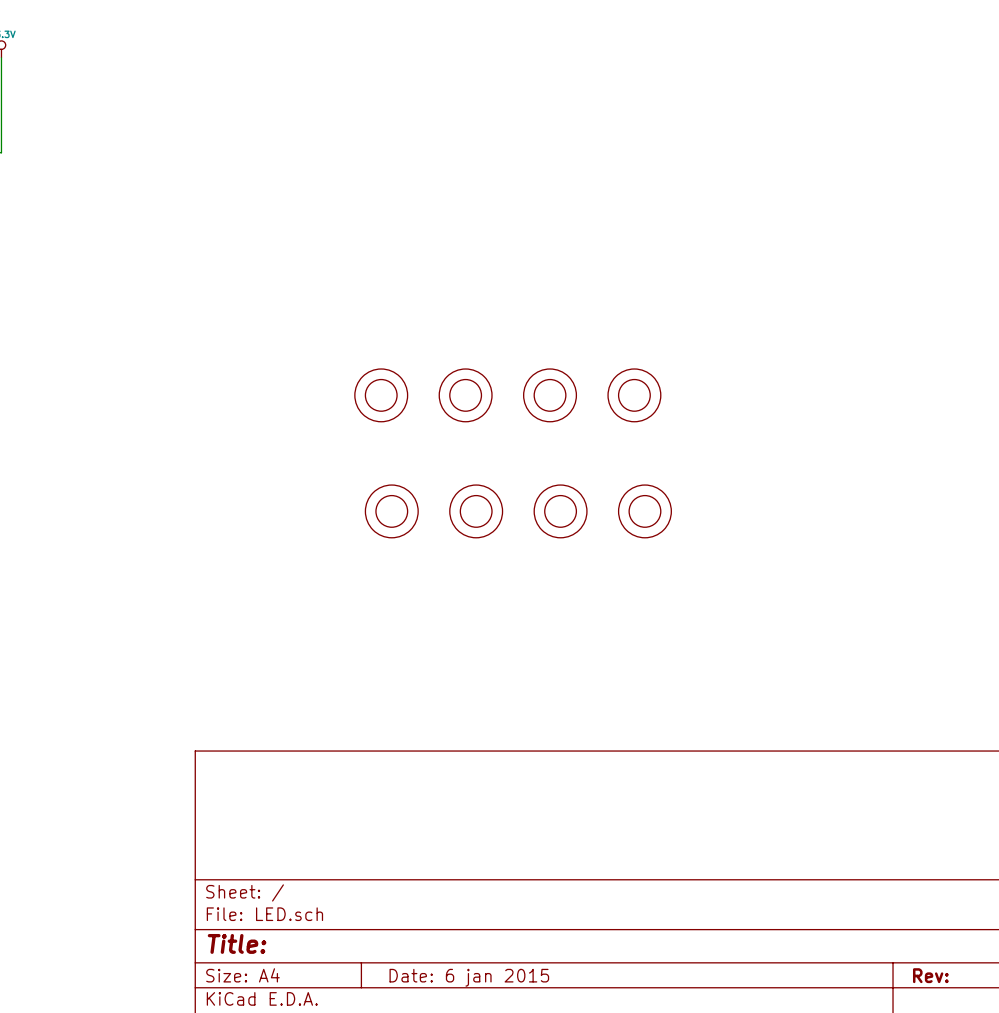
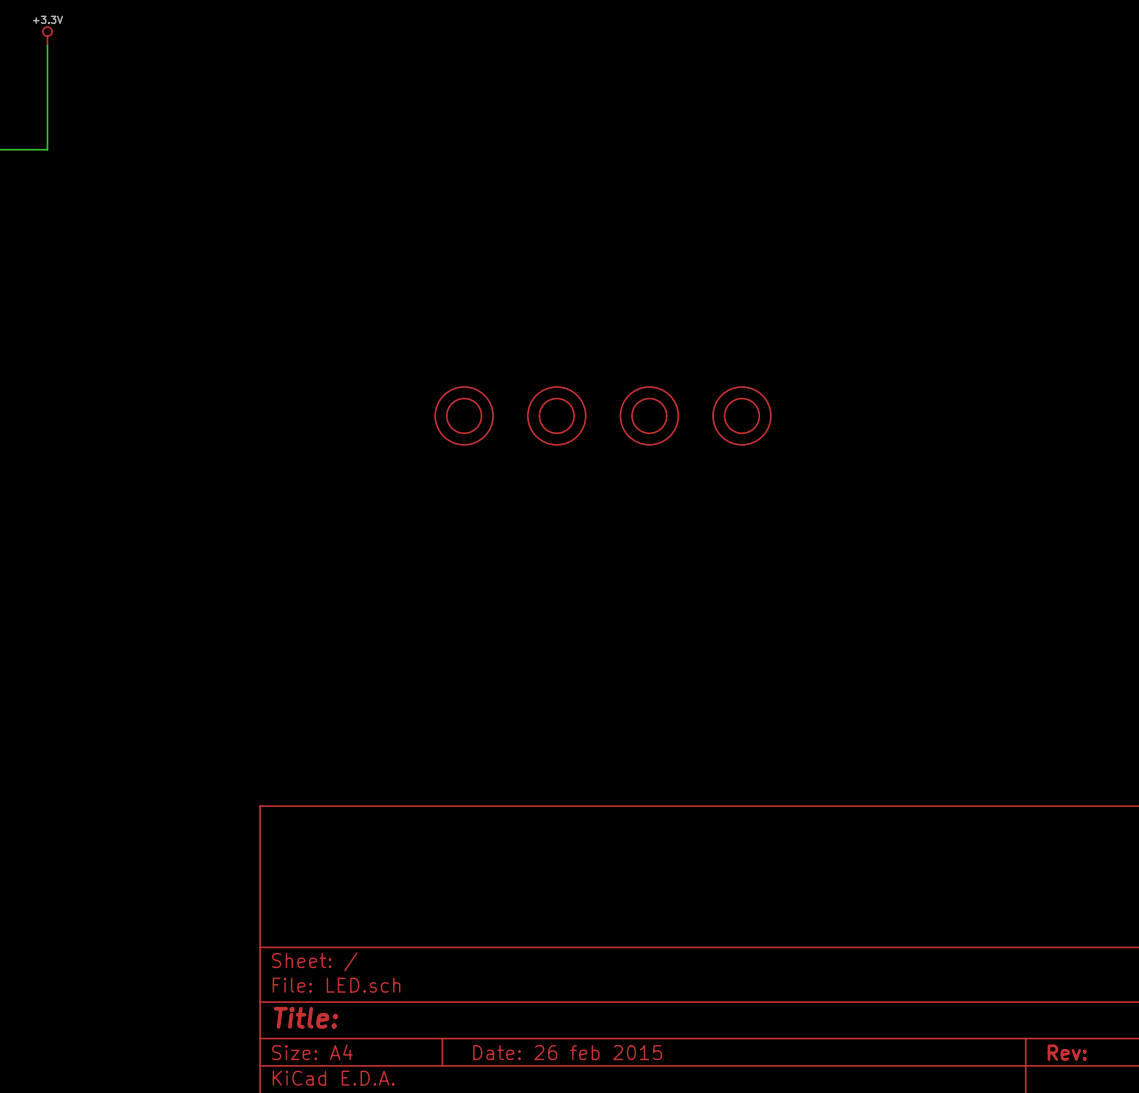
part: (391, 511) -> none
part: (476, 511) -> none
part: (560, 511) -> none
part: (644, 511) -> none
title block: Date: 6 jan 2015 (469, 977) -> Date: 26 feb 2015 (567, 1052)

